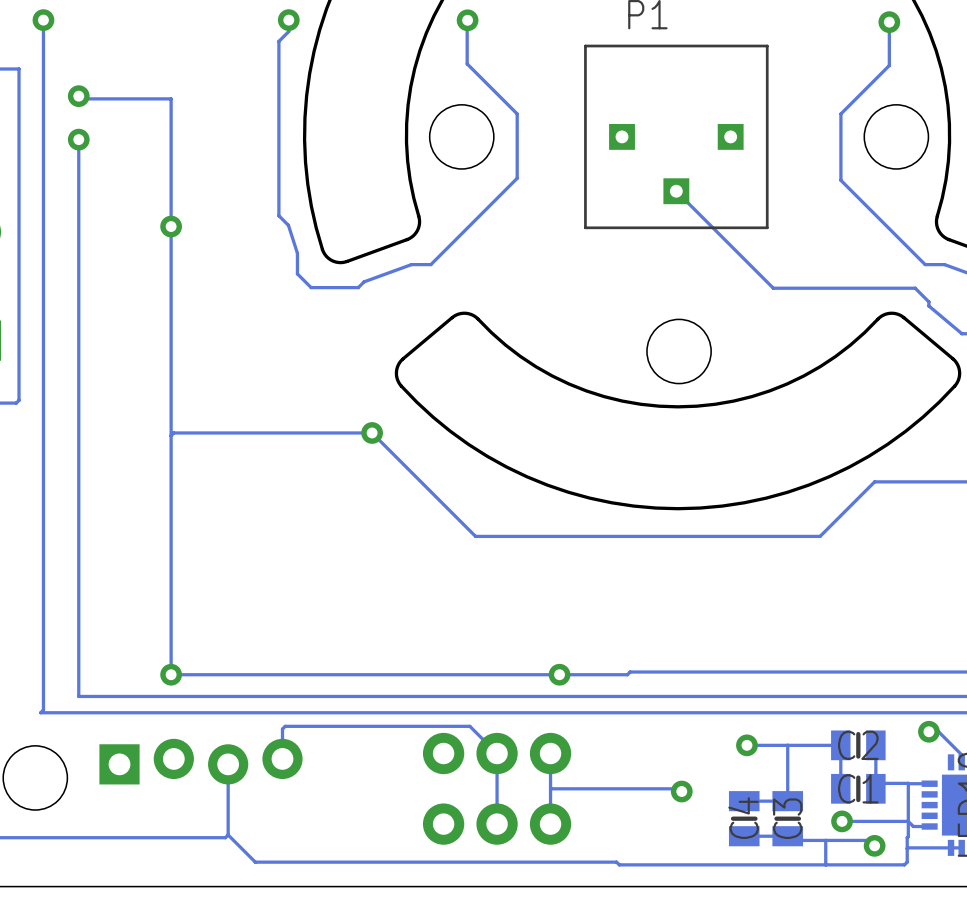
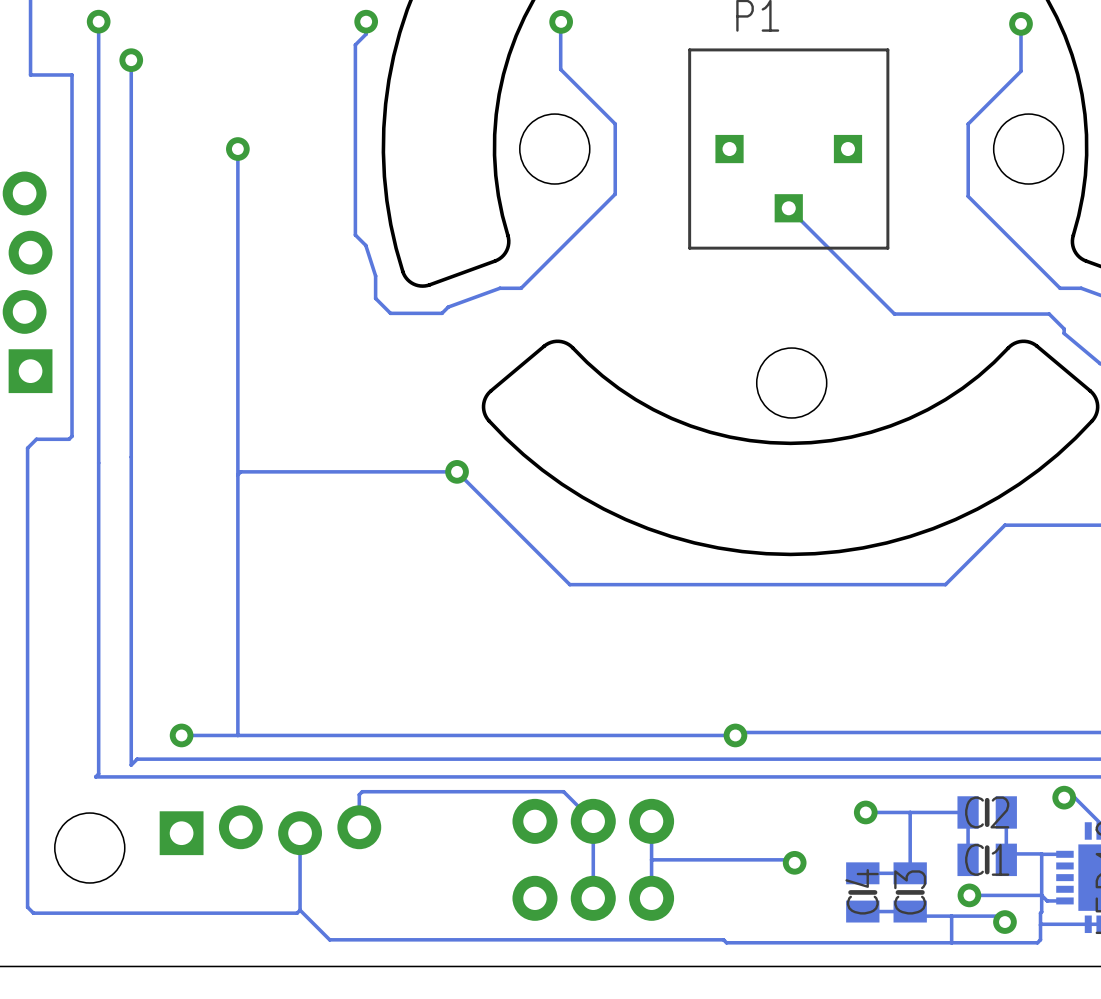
track: (78, 96) (81, 98) (171, 98) (171, 136) -> none
via position: (78, 96) -> (131, 60)
via: none -> (237, 149)
track: (78, 139) (78, 696) -> (131, 60) (131, 765) (137, 759)
via: (78, 139) -> none
via: (171, 226) -> none
track: none -> (237, 735) (181, 735)
via position: (171, 674) -> (181, 735)
via position: (559, 674) -> (735, 735)

